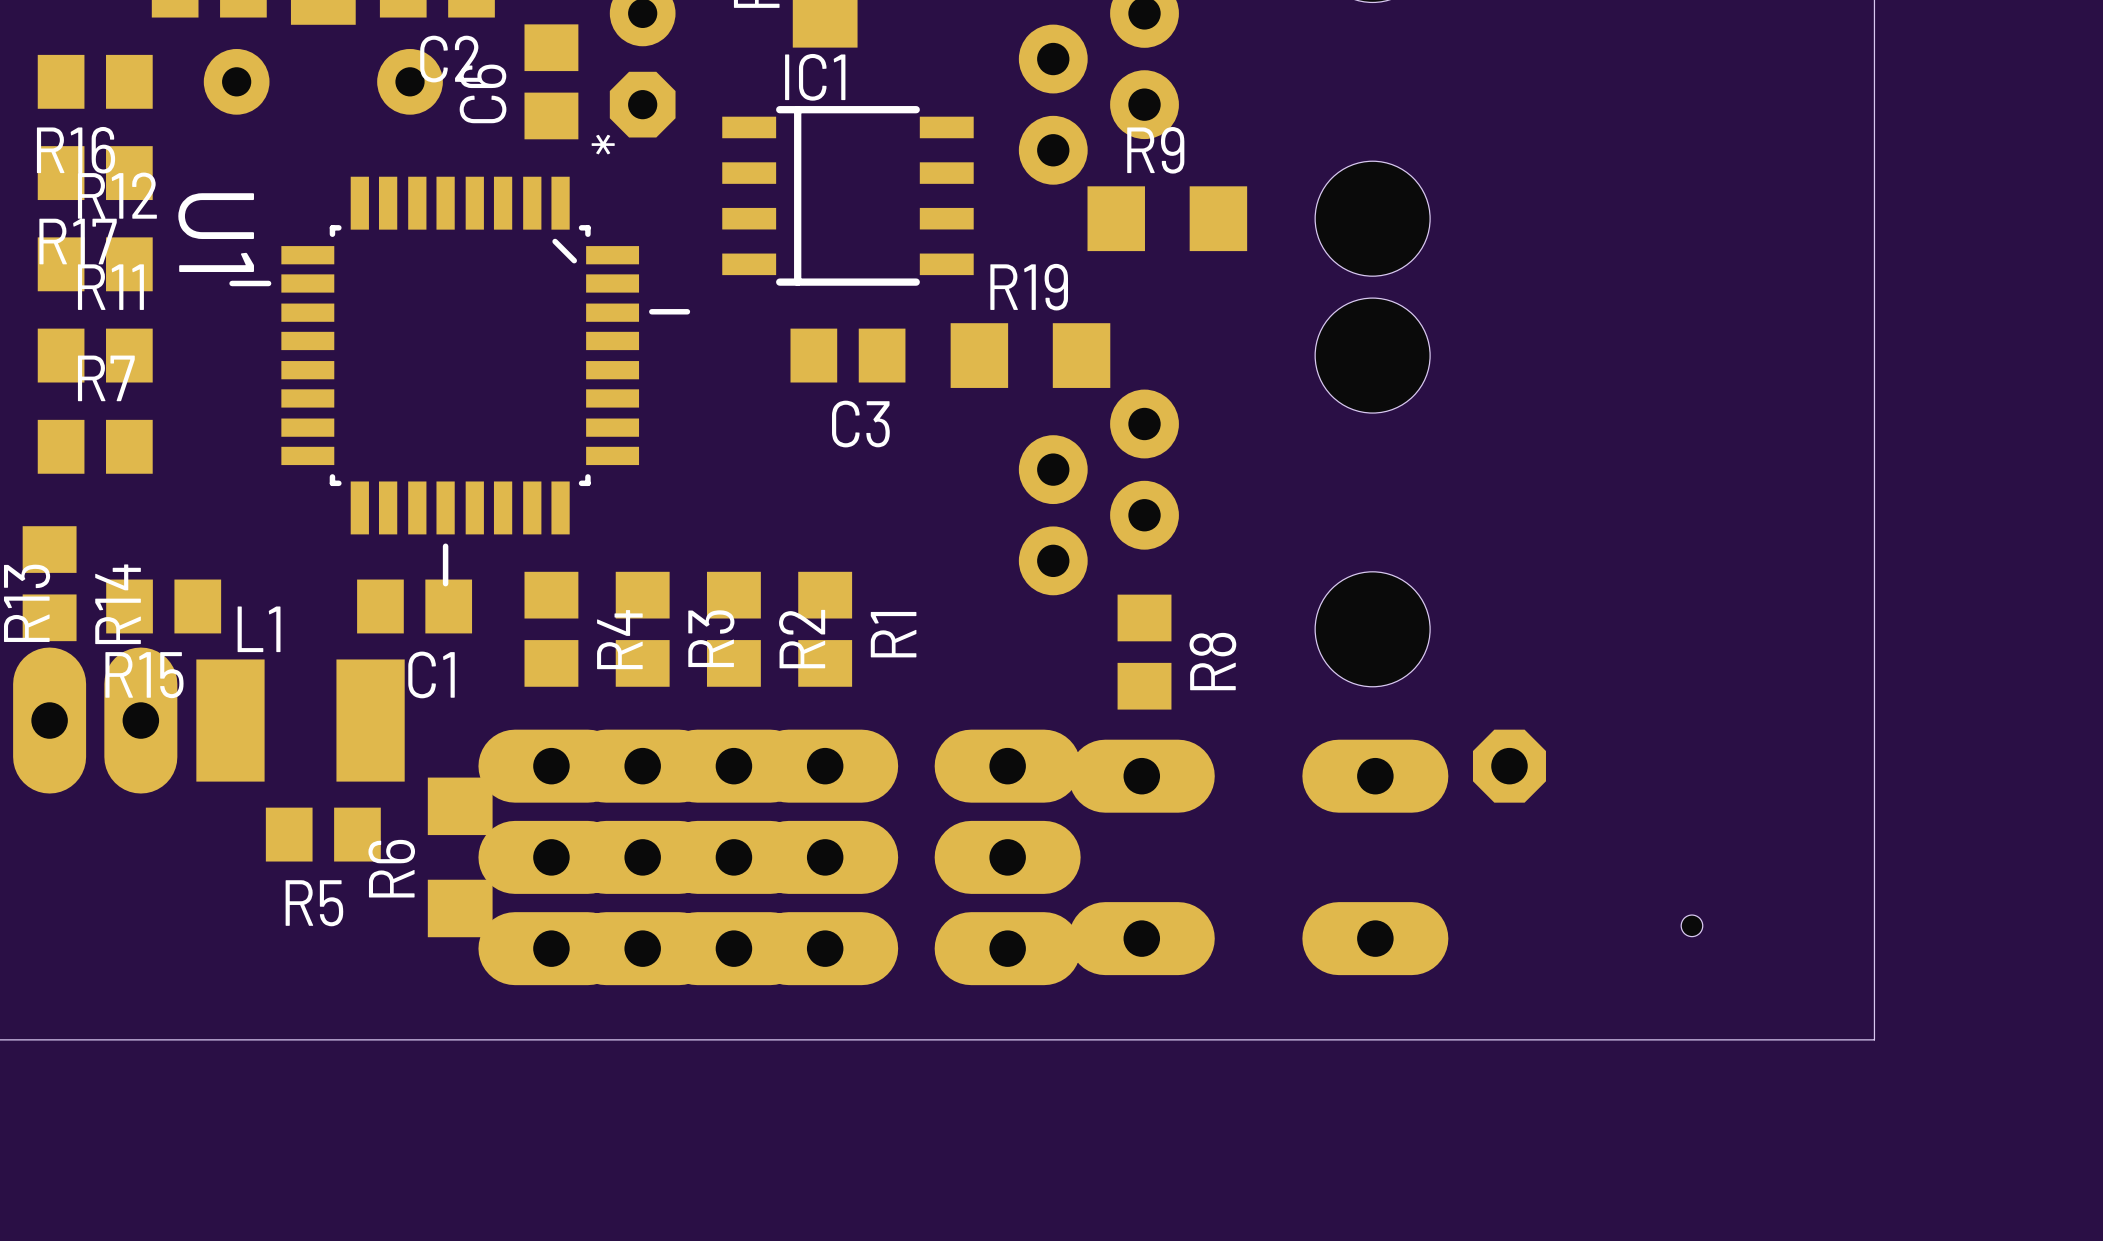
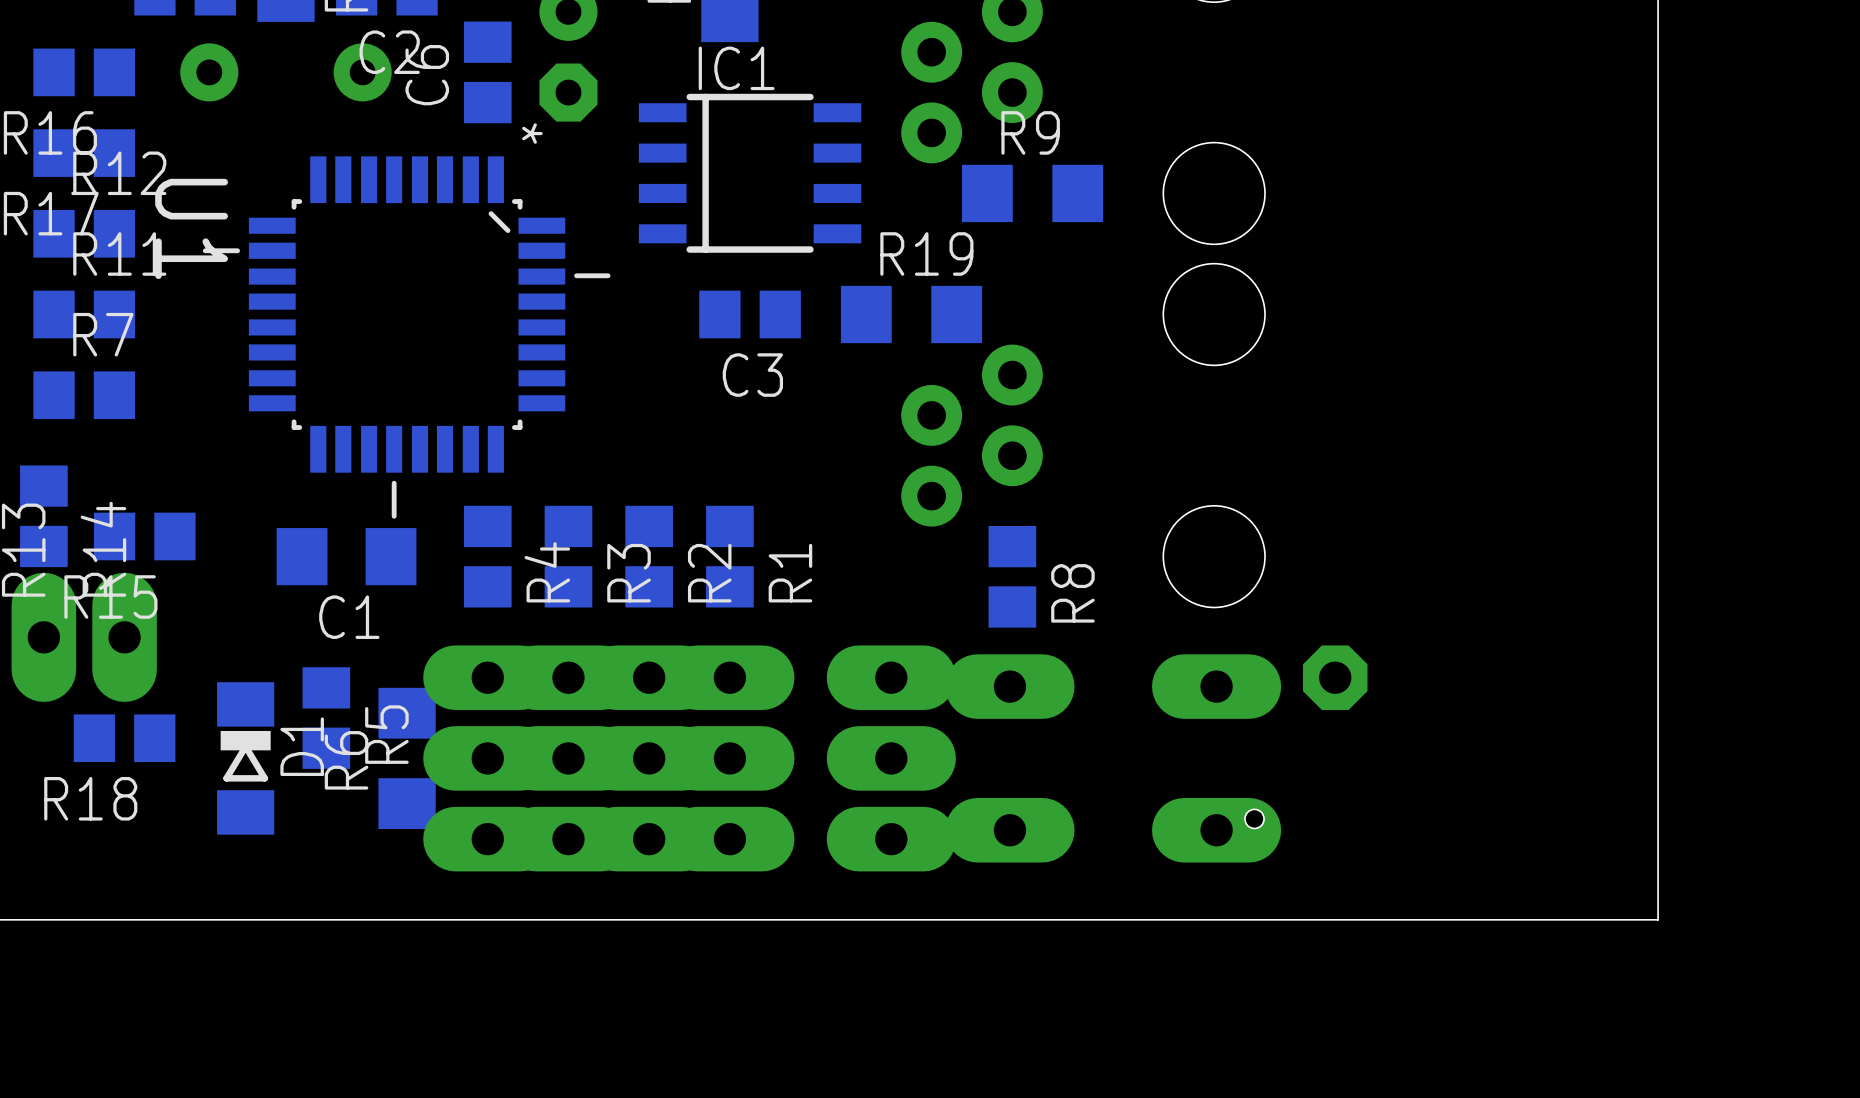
C1 footprint: [357, 579, 473, 634] -> [276, 528, 417, 586]
L1: (300, 720) -> none
R18: none -> (124, 738)
R5 rotation: 0° (323, 834) -> 90° clockwise (326, 718)
D1: none -> (245, 758)
R5 name position: R5 (314, 903) -> R5 (386, 734)
hole position: (1691, 925) -> (1254, 818)

